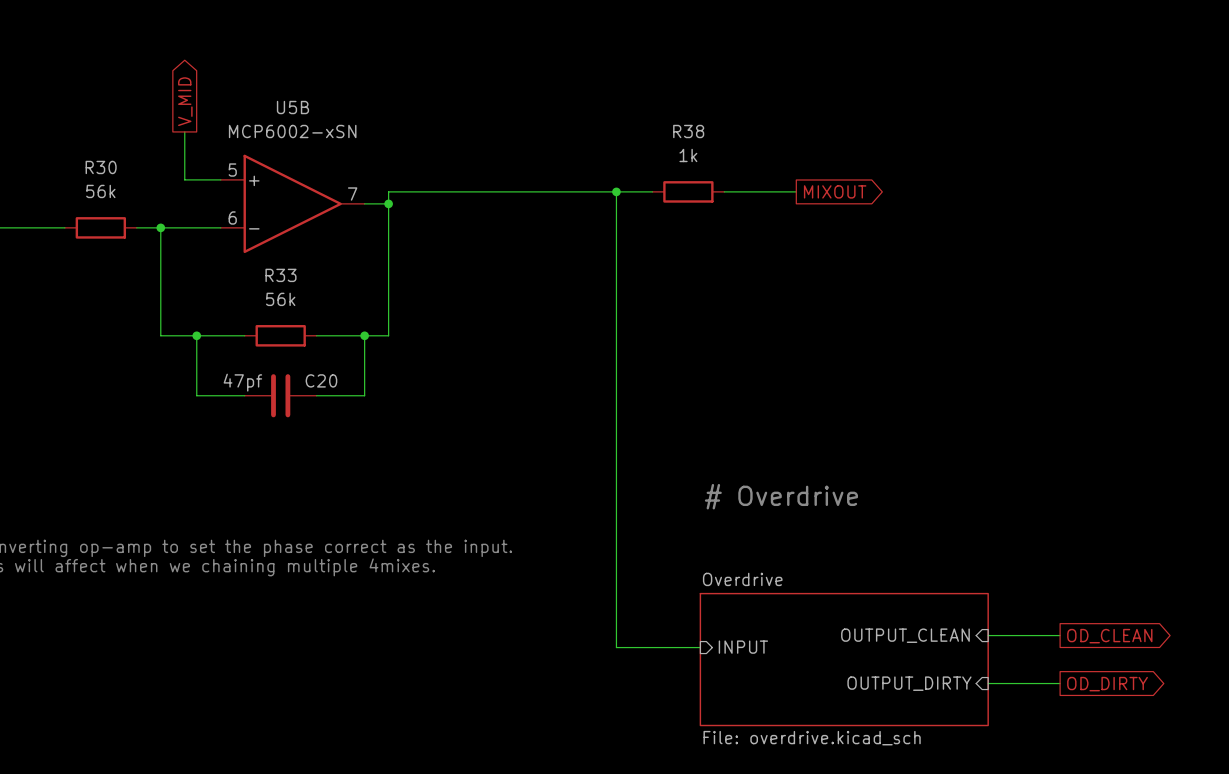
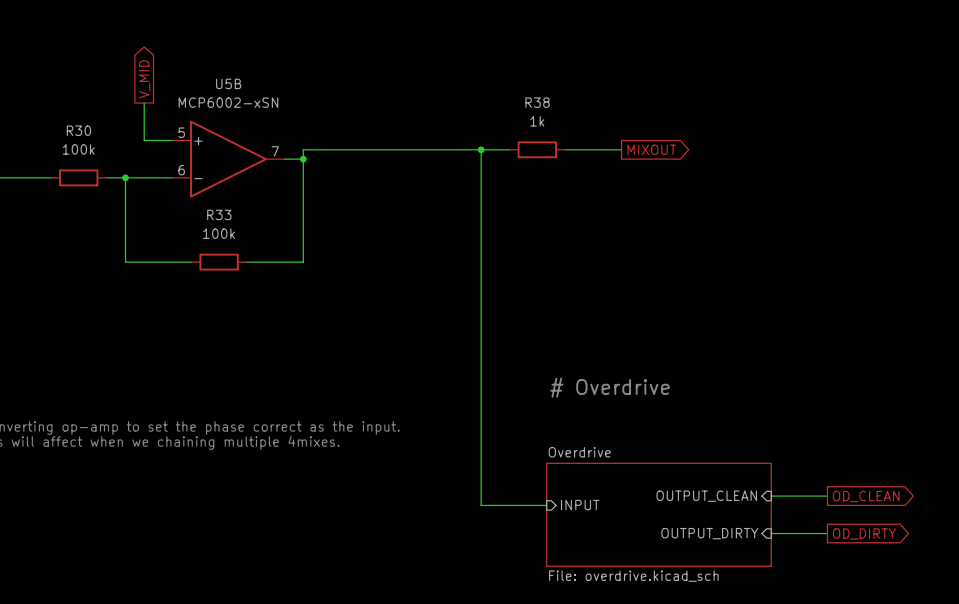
R30 value: 56k (100, 191) -> 100k (78, 149)
R33 value: 56k (280, 299) -> 100k (219, 233)
wire: (196, 335) (196, 395) (244, 395) -> none
junction: (196, 335) -> none
wire: (364, 335) (364, 395) (316, 395) -> none
junction: (364, 335) -> none
C20: 47pf (280, 395) -> none

